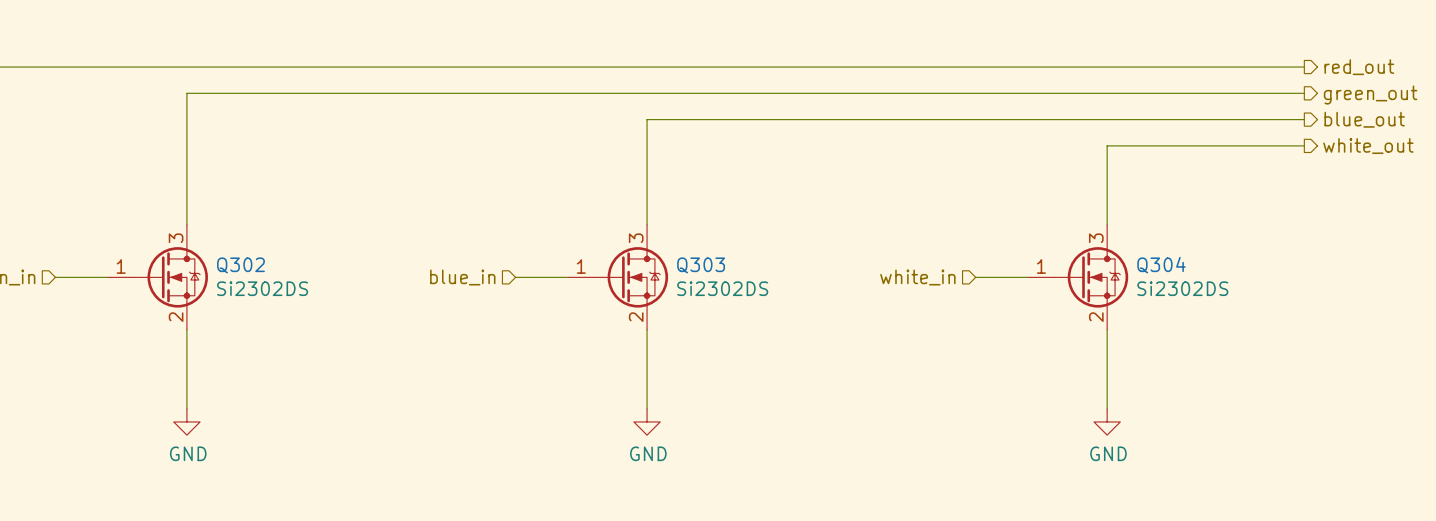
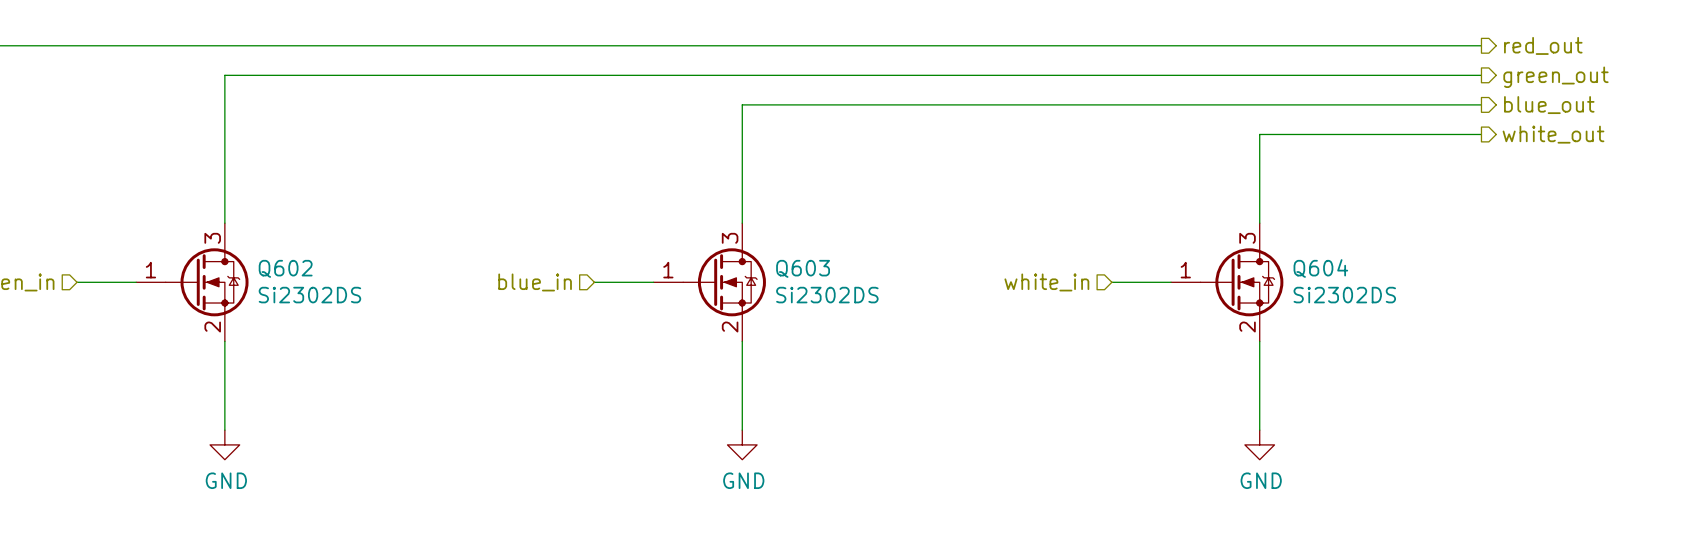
Q302 name: Q302 (240, 265) -> Q602 (285, 268)
Q303 name: Q303 (701, 265) -> Q603 (803, 268)
Q304 name: Q304 (1161, 265) -> Q604 (1320, 268)

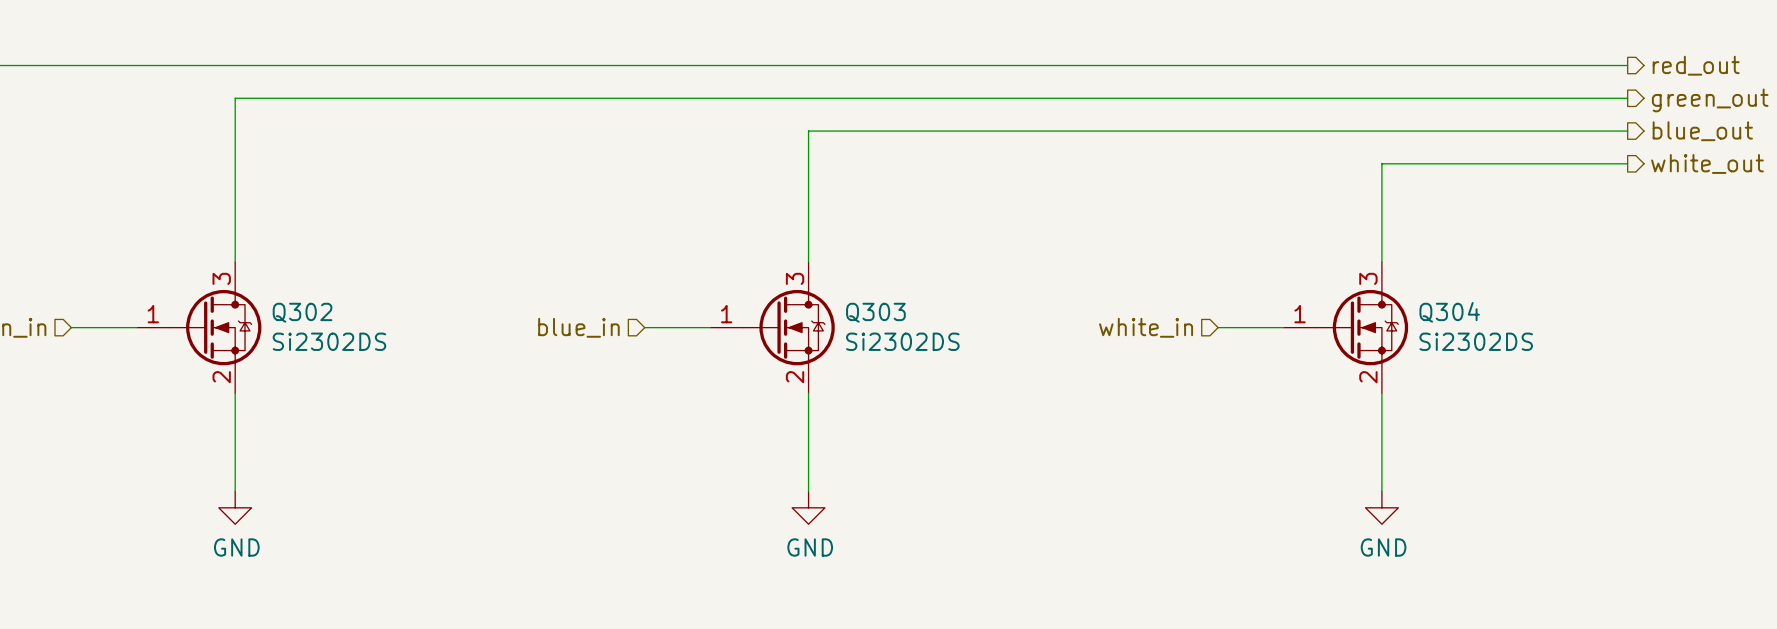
Q602 name: Q602 (285, 268) -> Q302 (302, 312)
Q603 name: Q603 (803, 268) -> Q303 (875, 312)
Q604 name: Q604 (1320, 268) -> Q304 (1449, 312)

